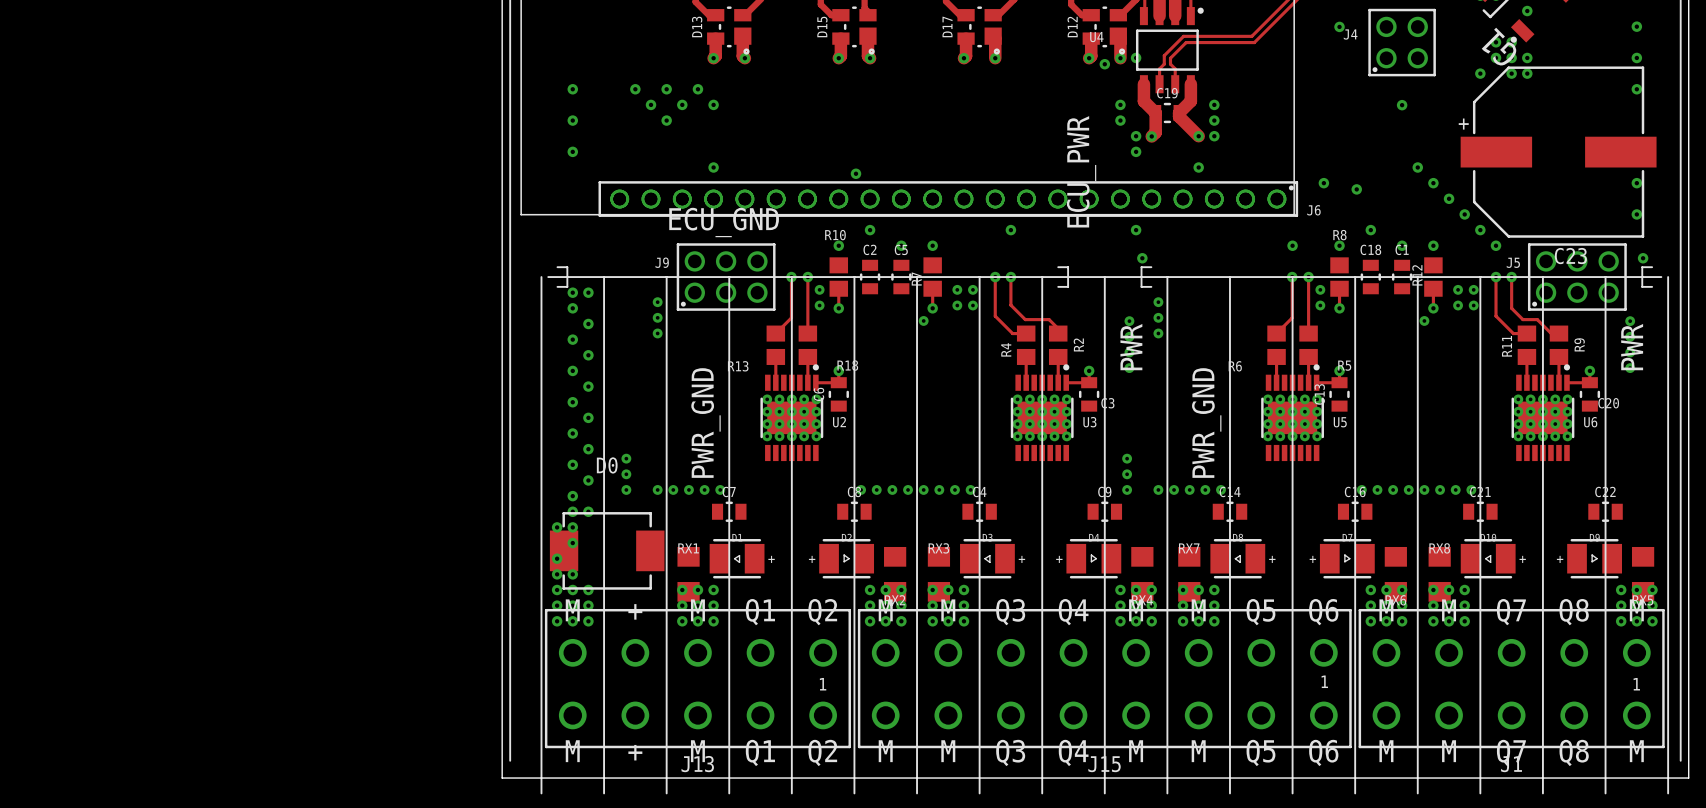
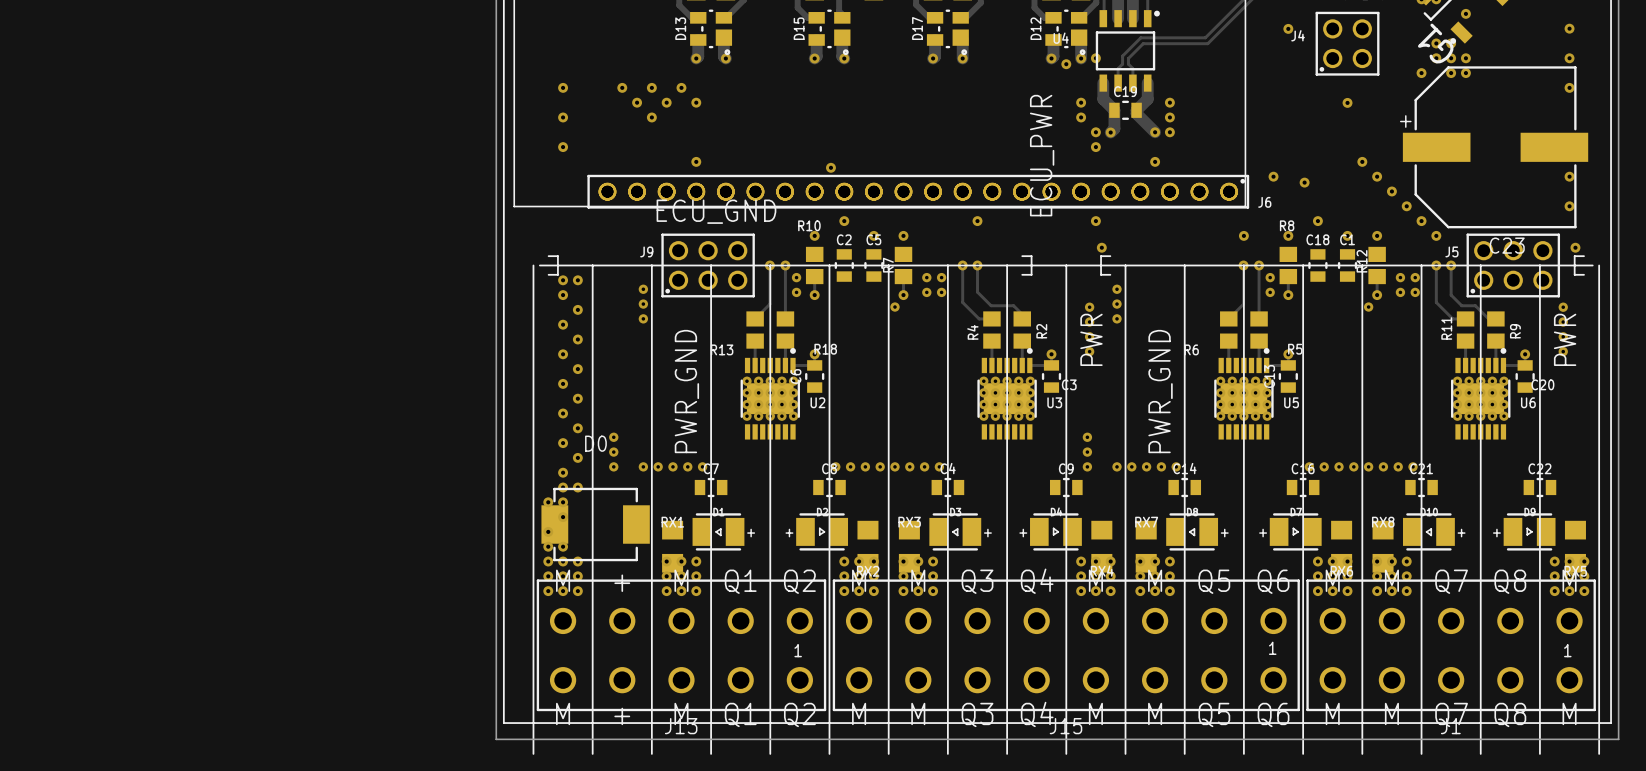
line: none -> (503, 723) (1611, 723)

